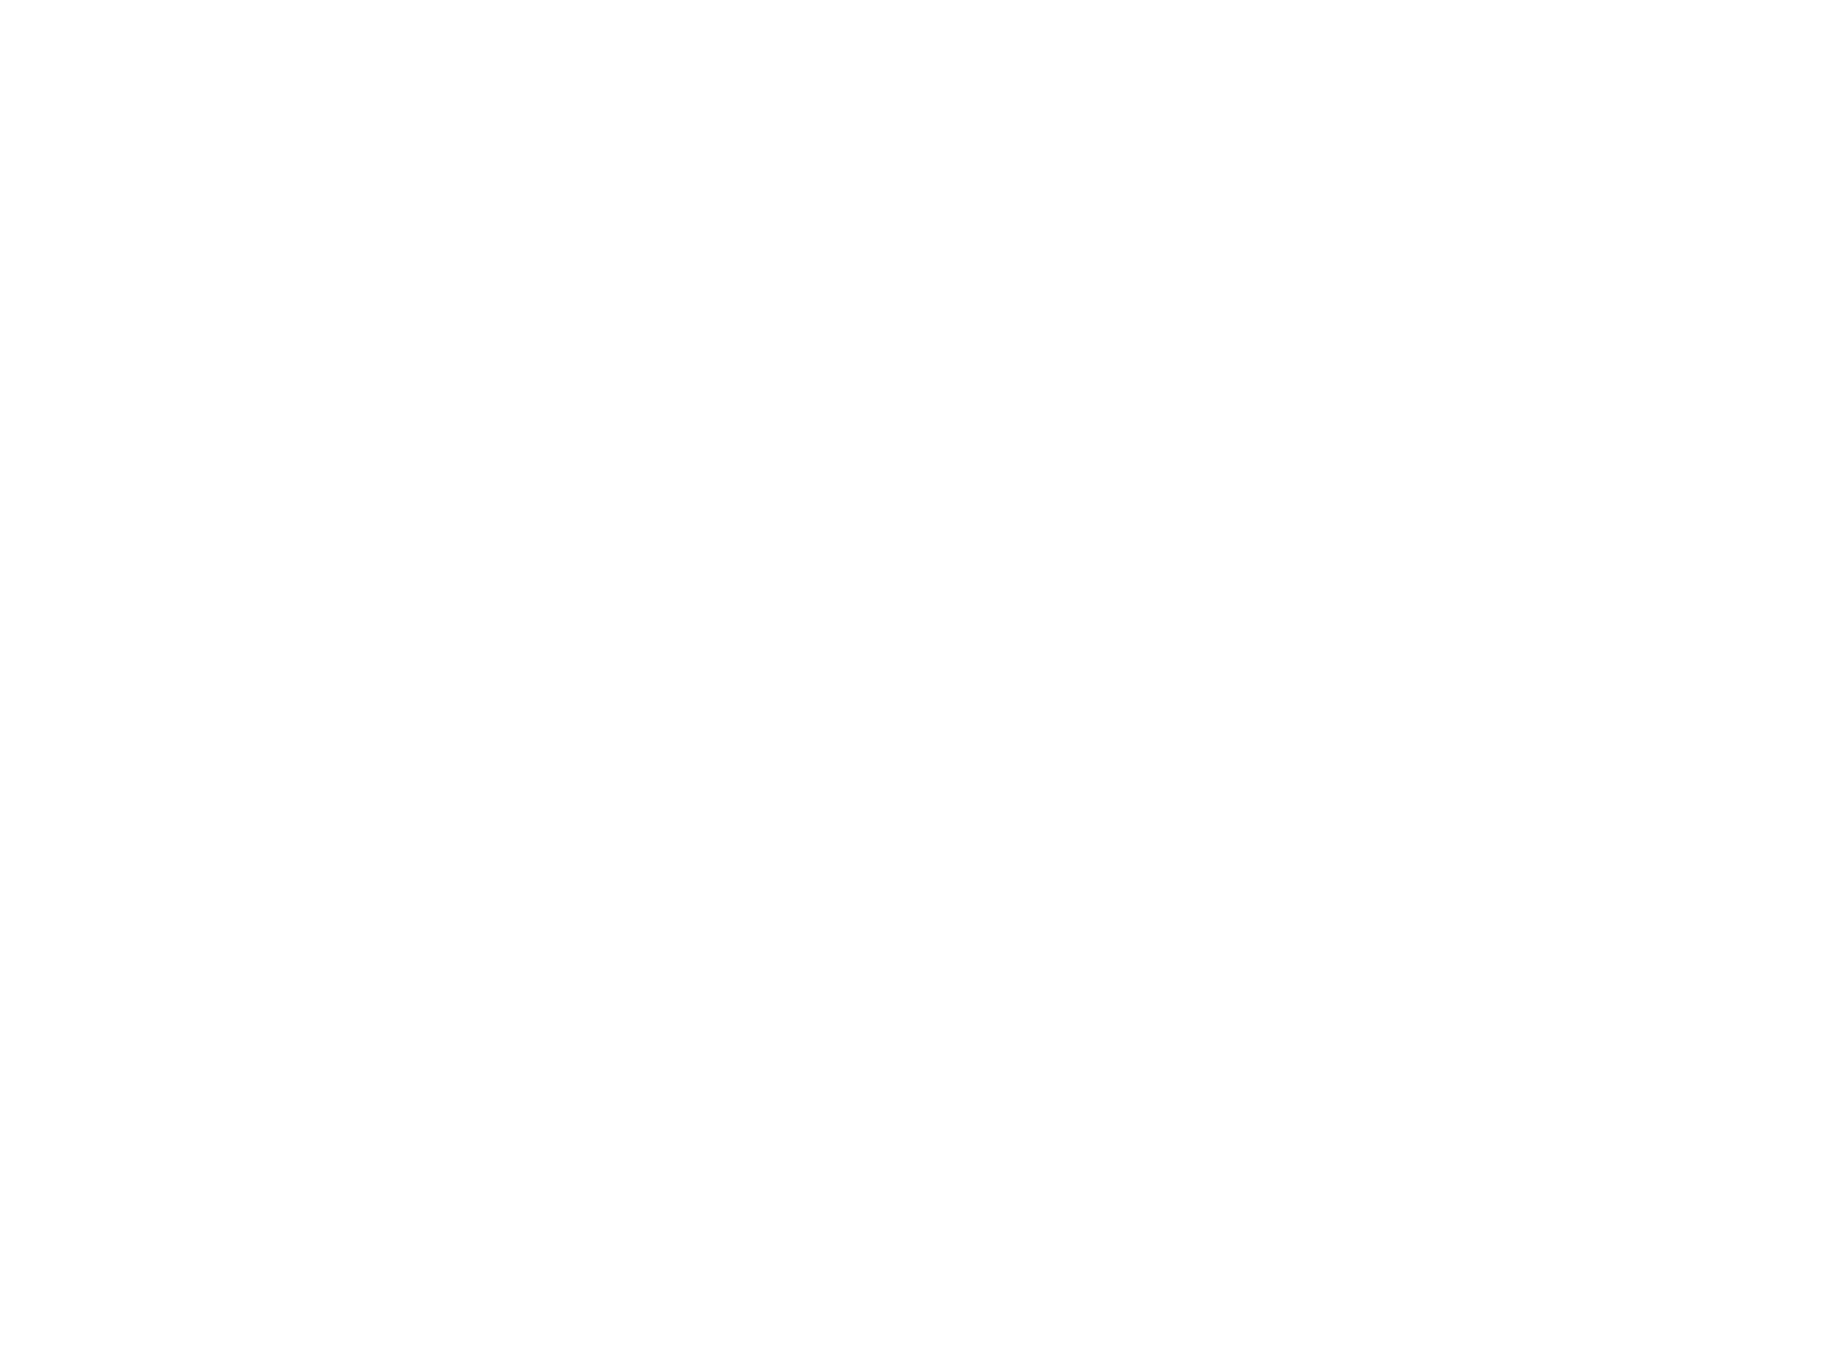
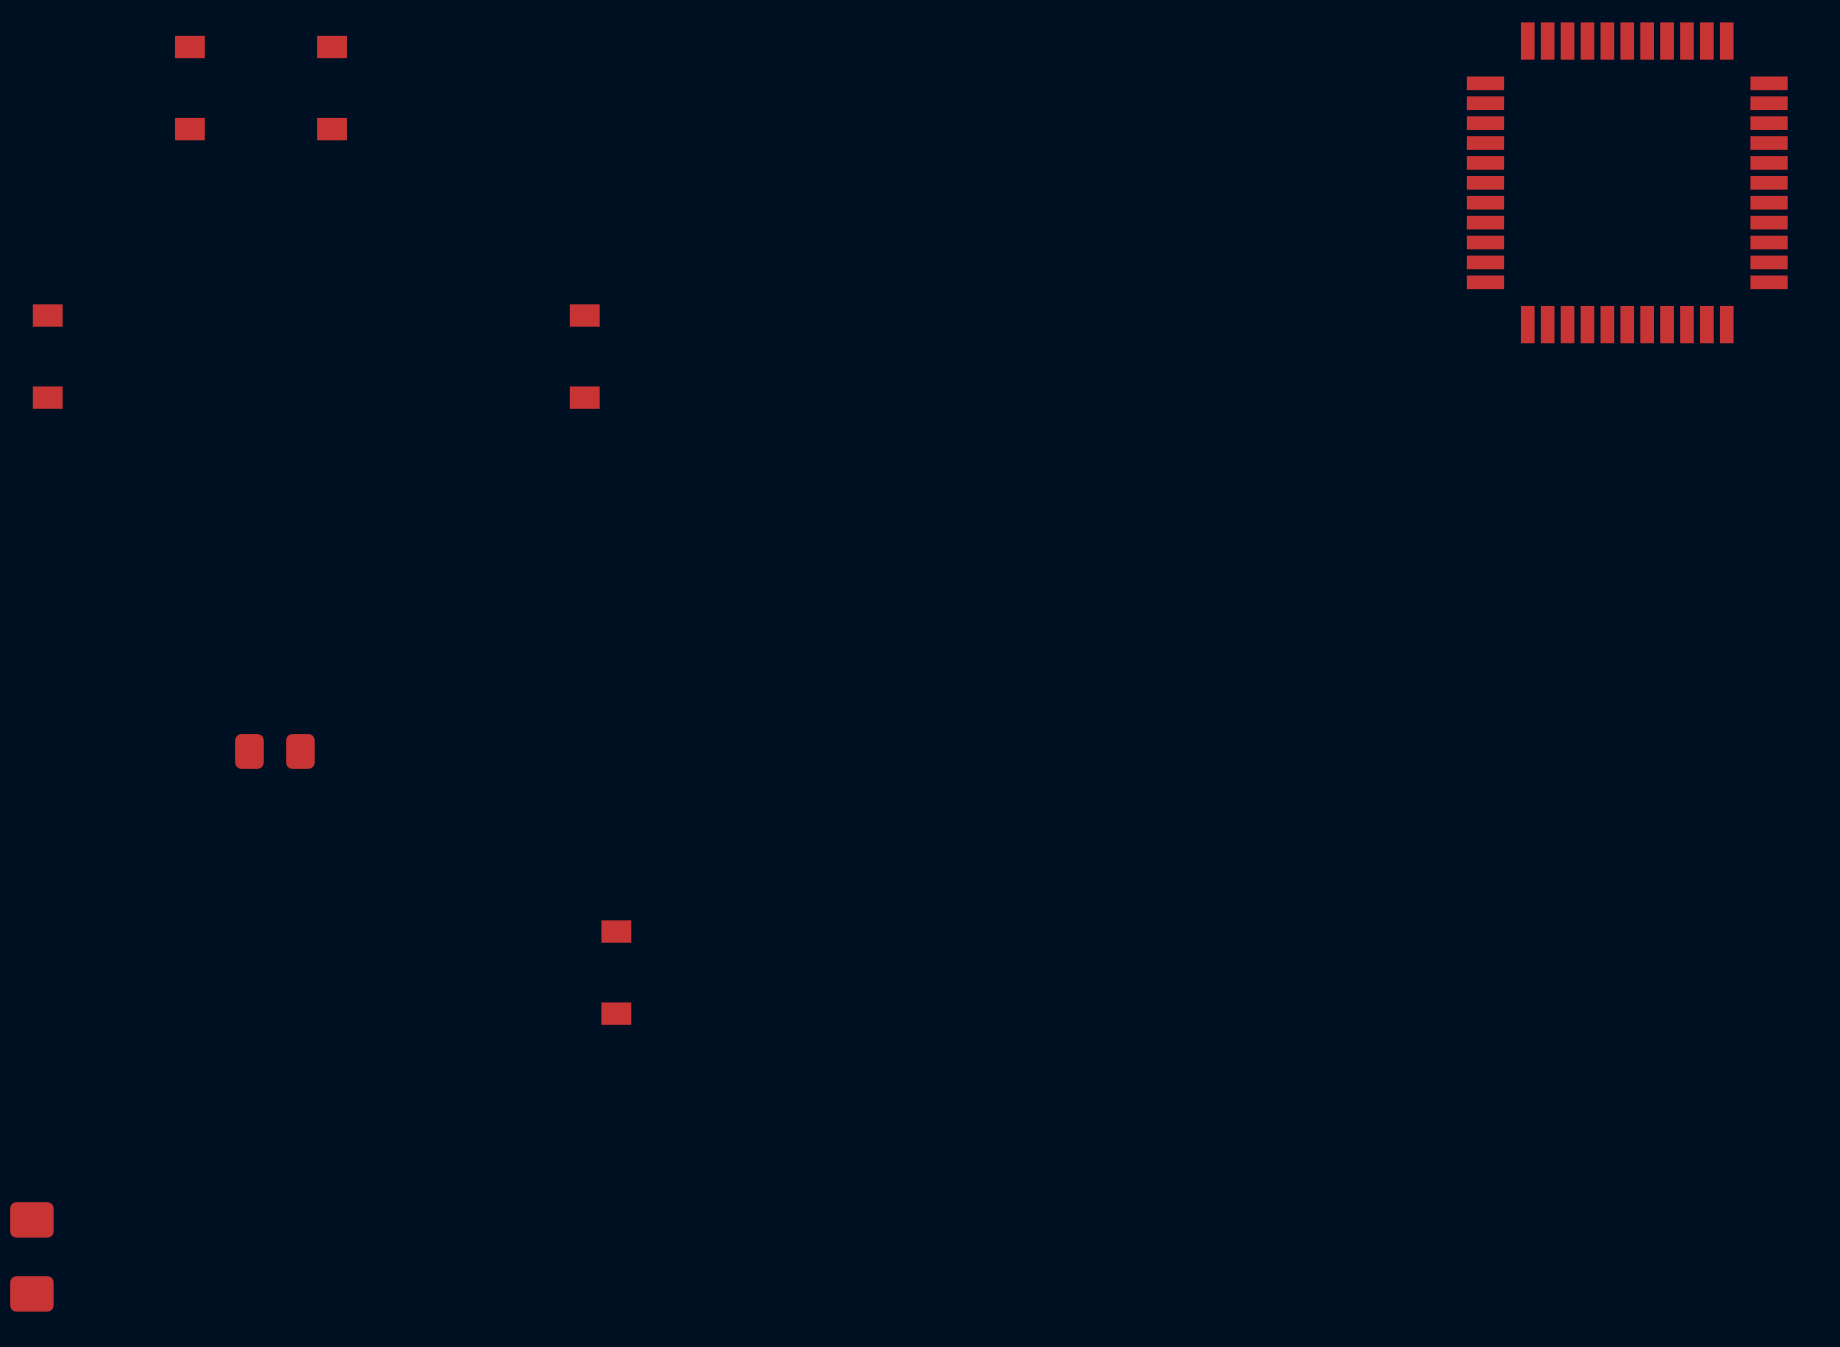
part: none -> (189, 88)
part: none -> (332, 88)
part: none -> (1627, 182)
part: none -> (47, 356)
part: none -> (584, 356)
part: none -> (274, 751)
part: none -> (616, 972)
part: none -> (31, 1256)

